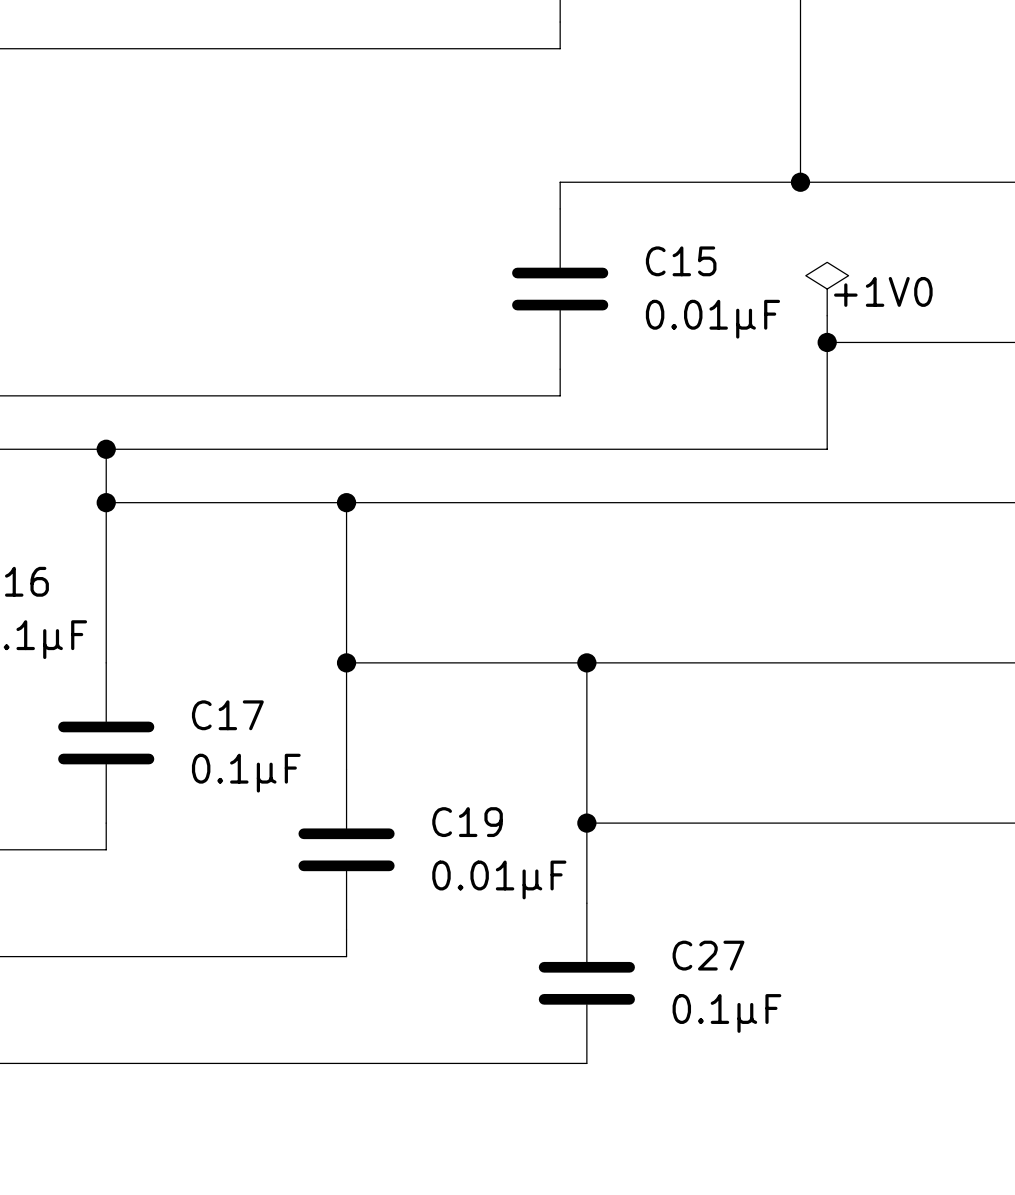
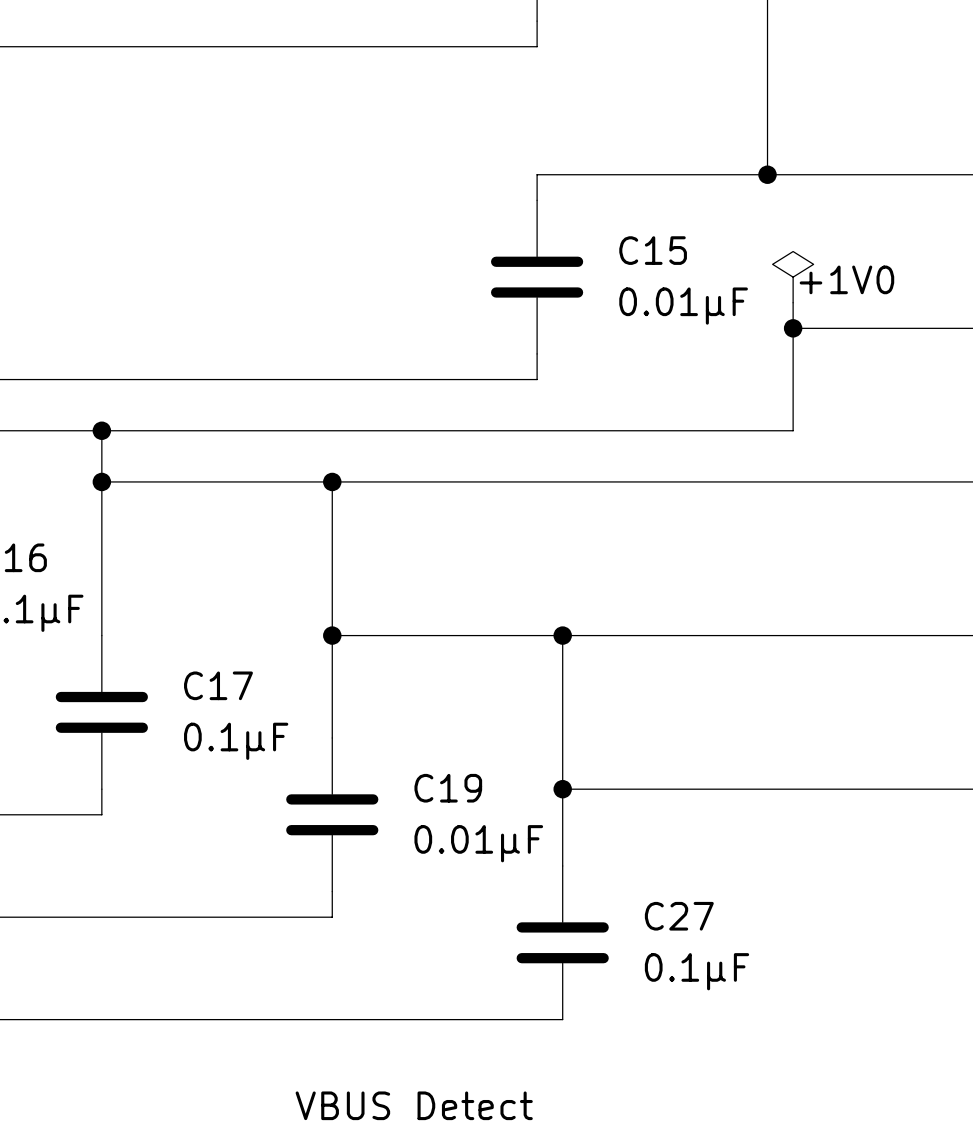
text: none -> VBUS Detect (414, 1105)

